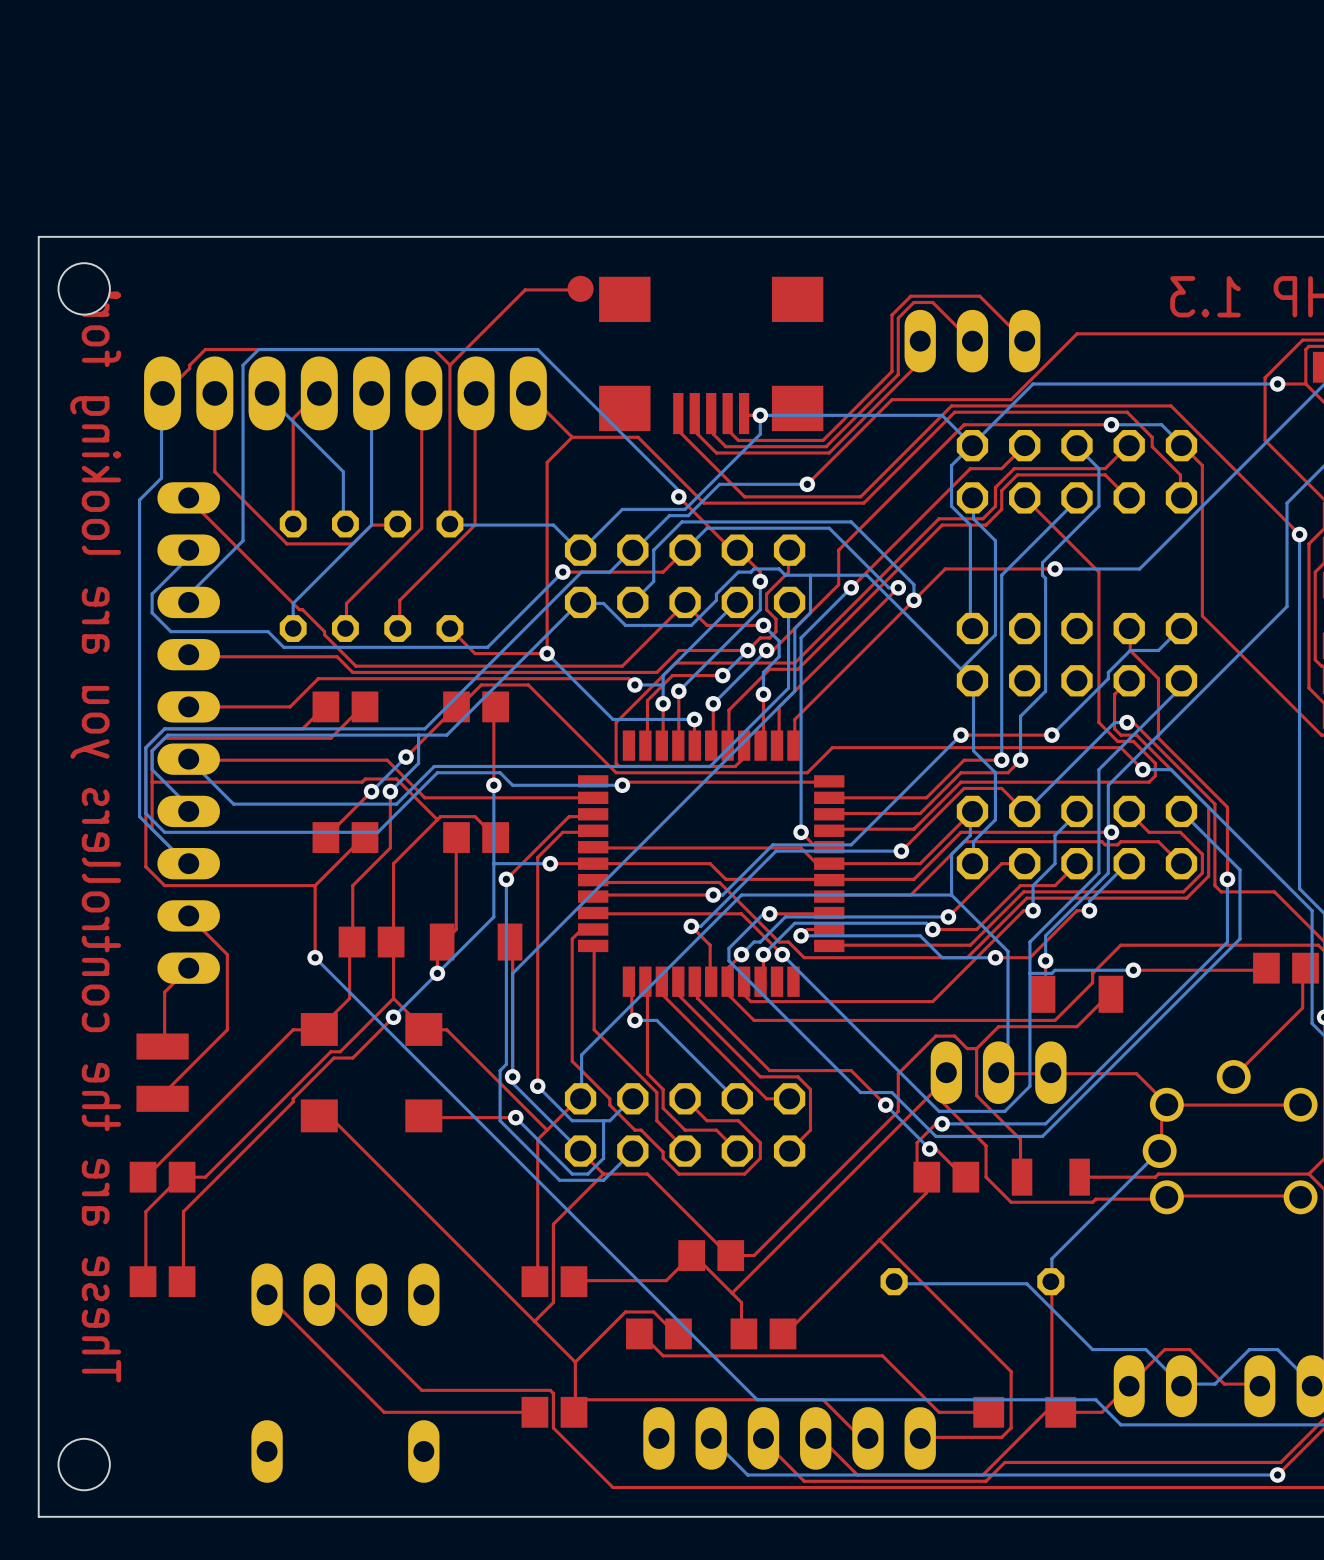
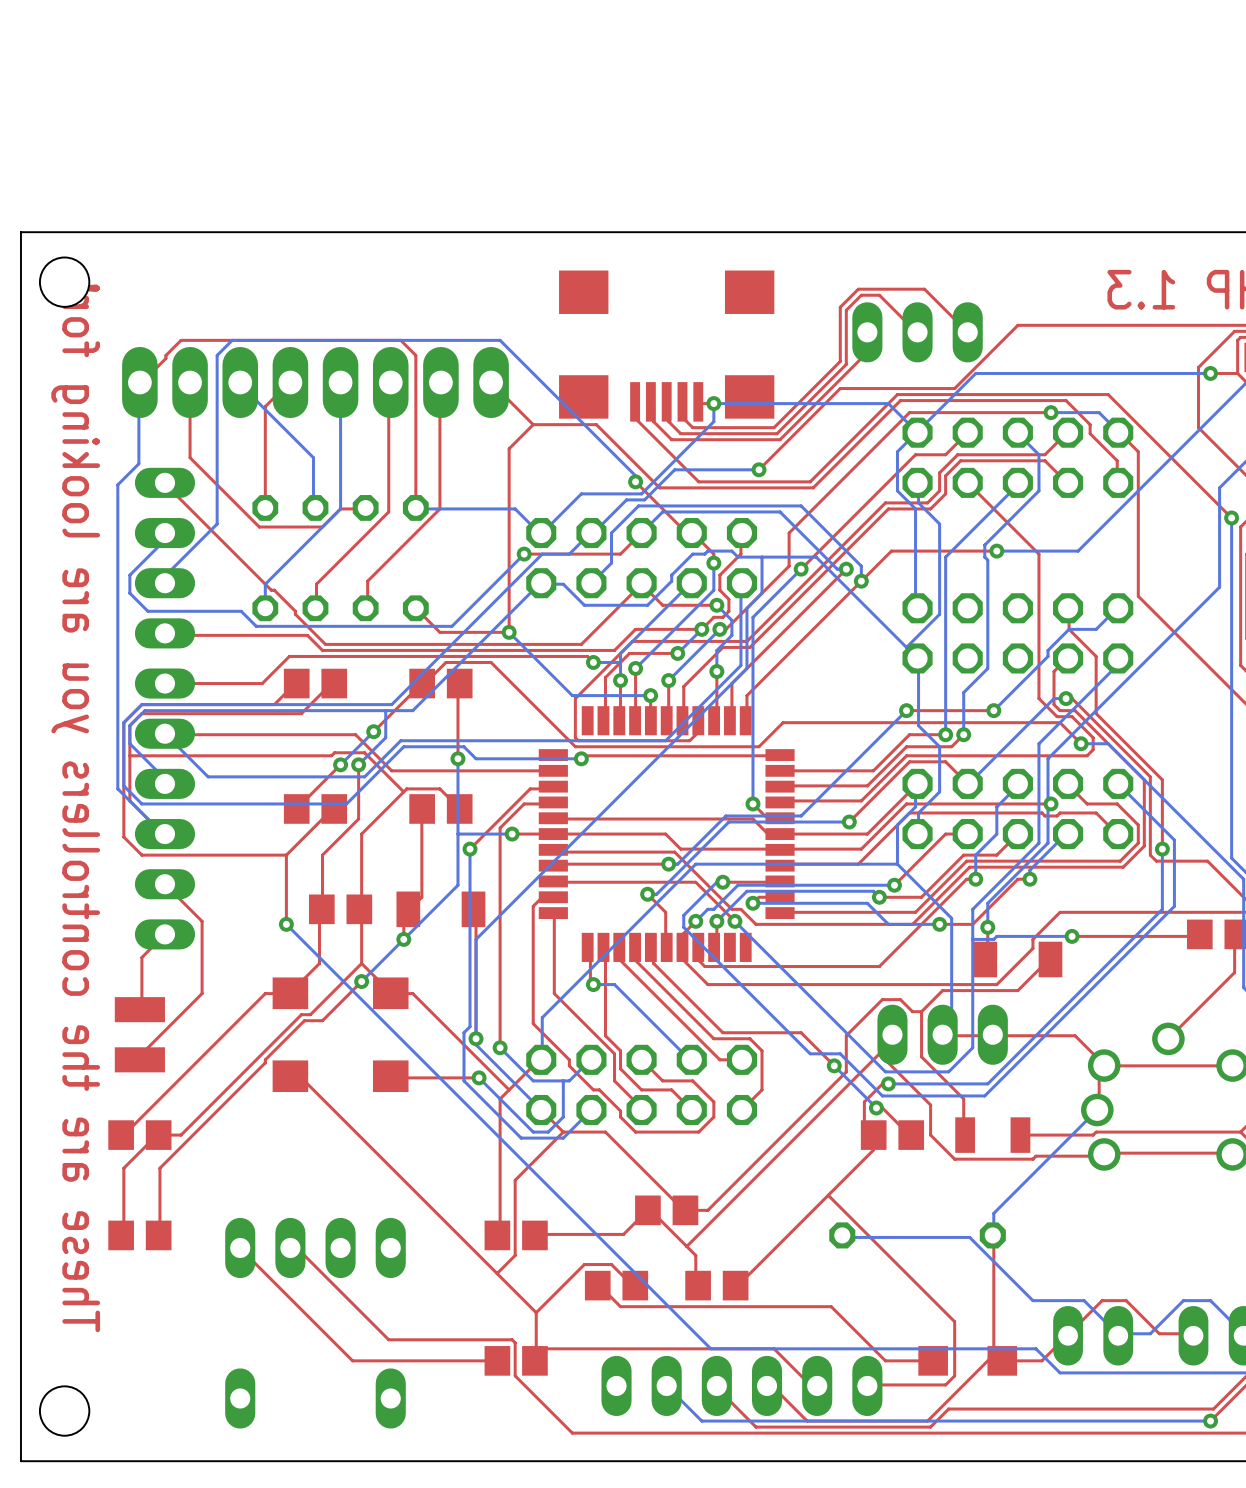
top track: (580, 288) (525, 289) (449, 365) -> none
part: (580, 288) -> none

